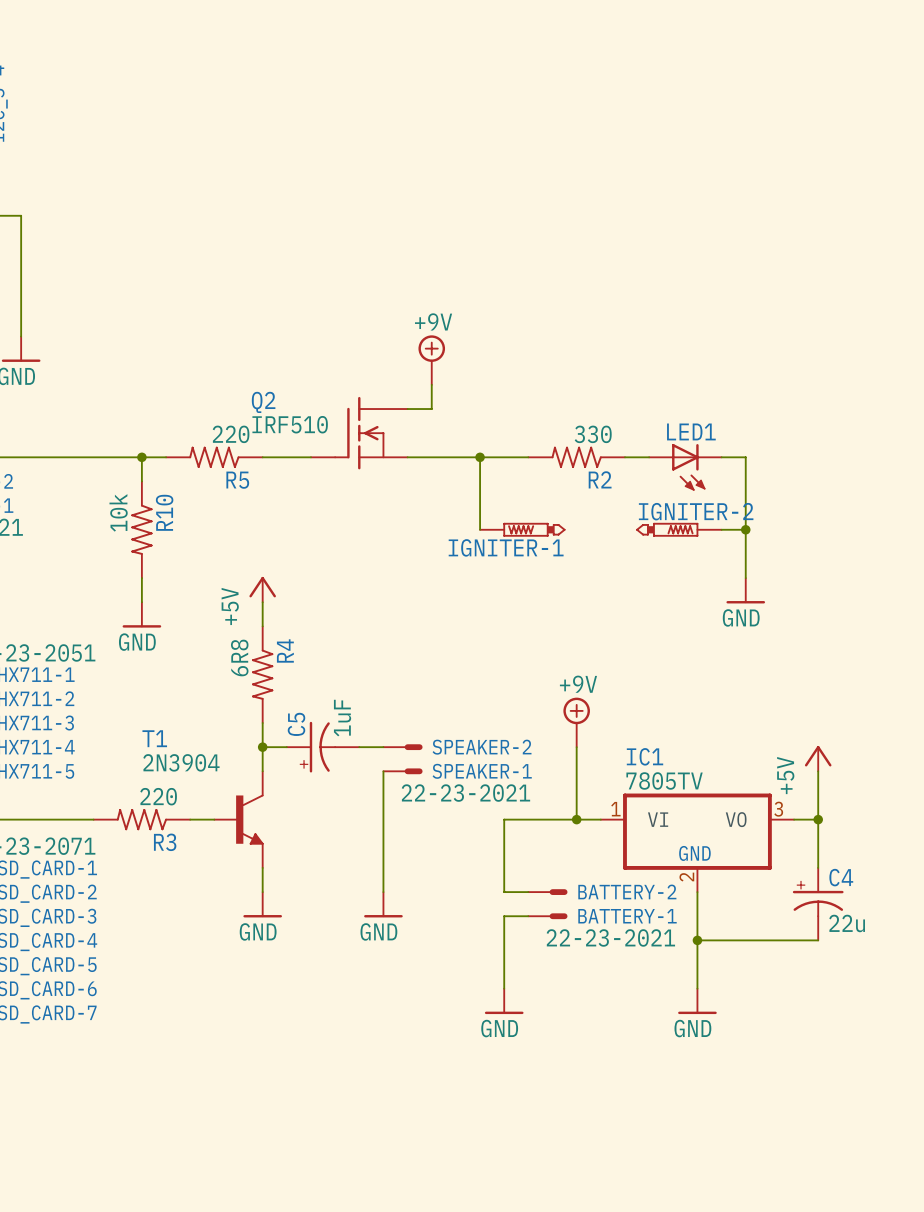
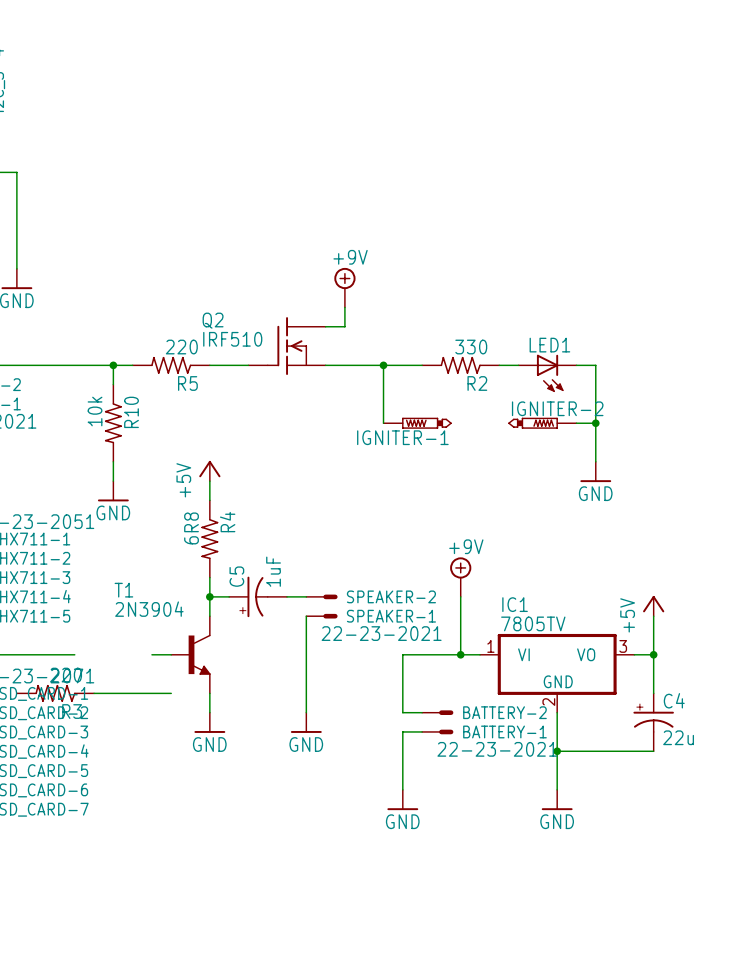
R3 position: (141, 819) -> (55, 693)
wire: none -> (94, 693) (171, 693)

